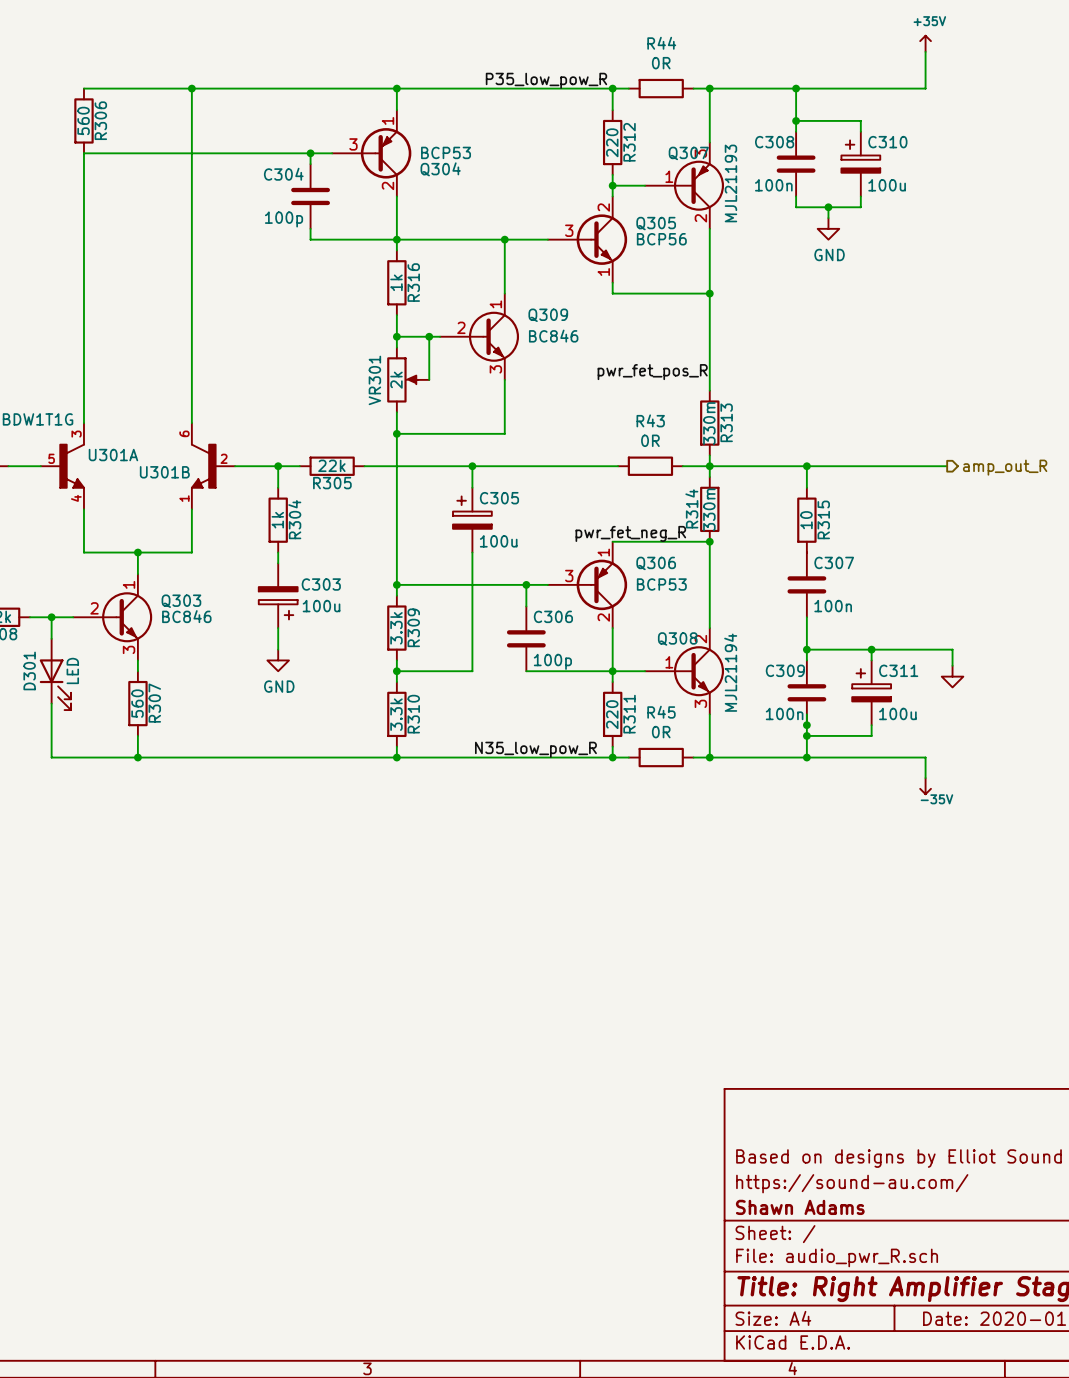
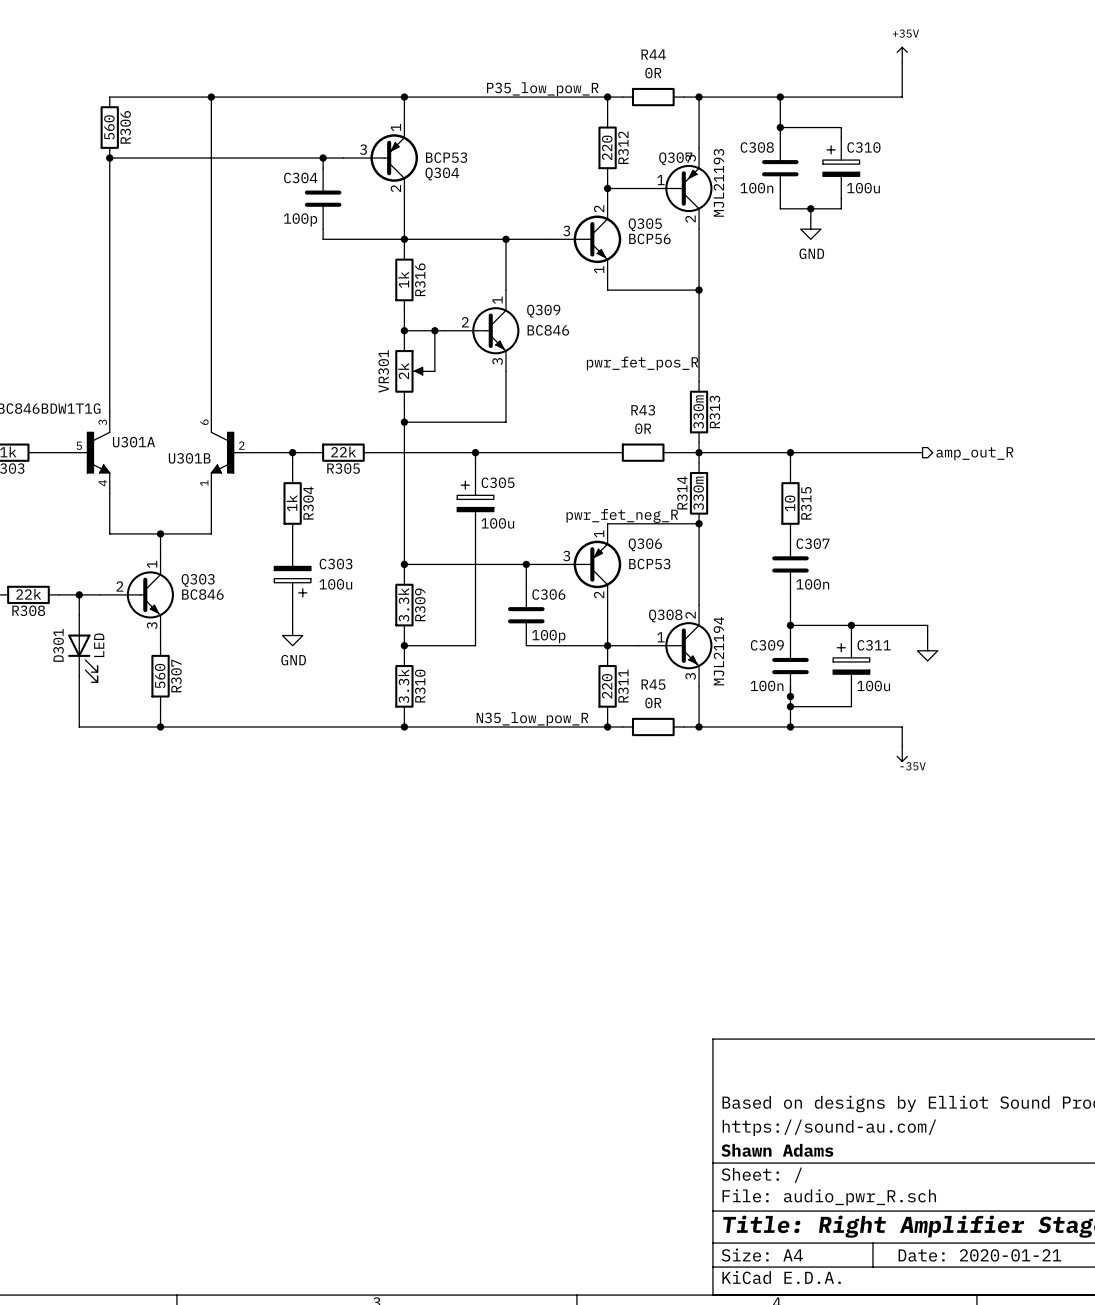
junction: none -> (109, 158)

